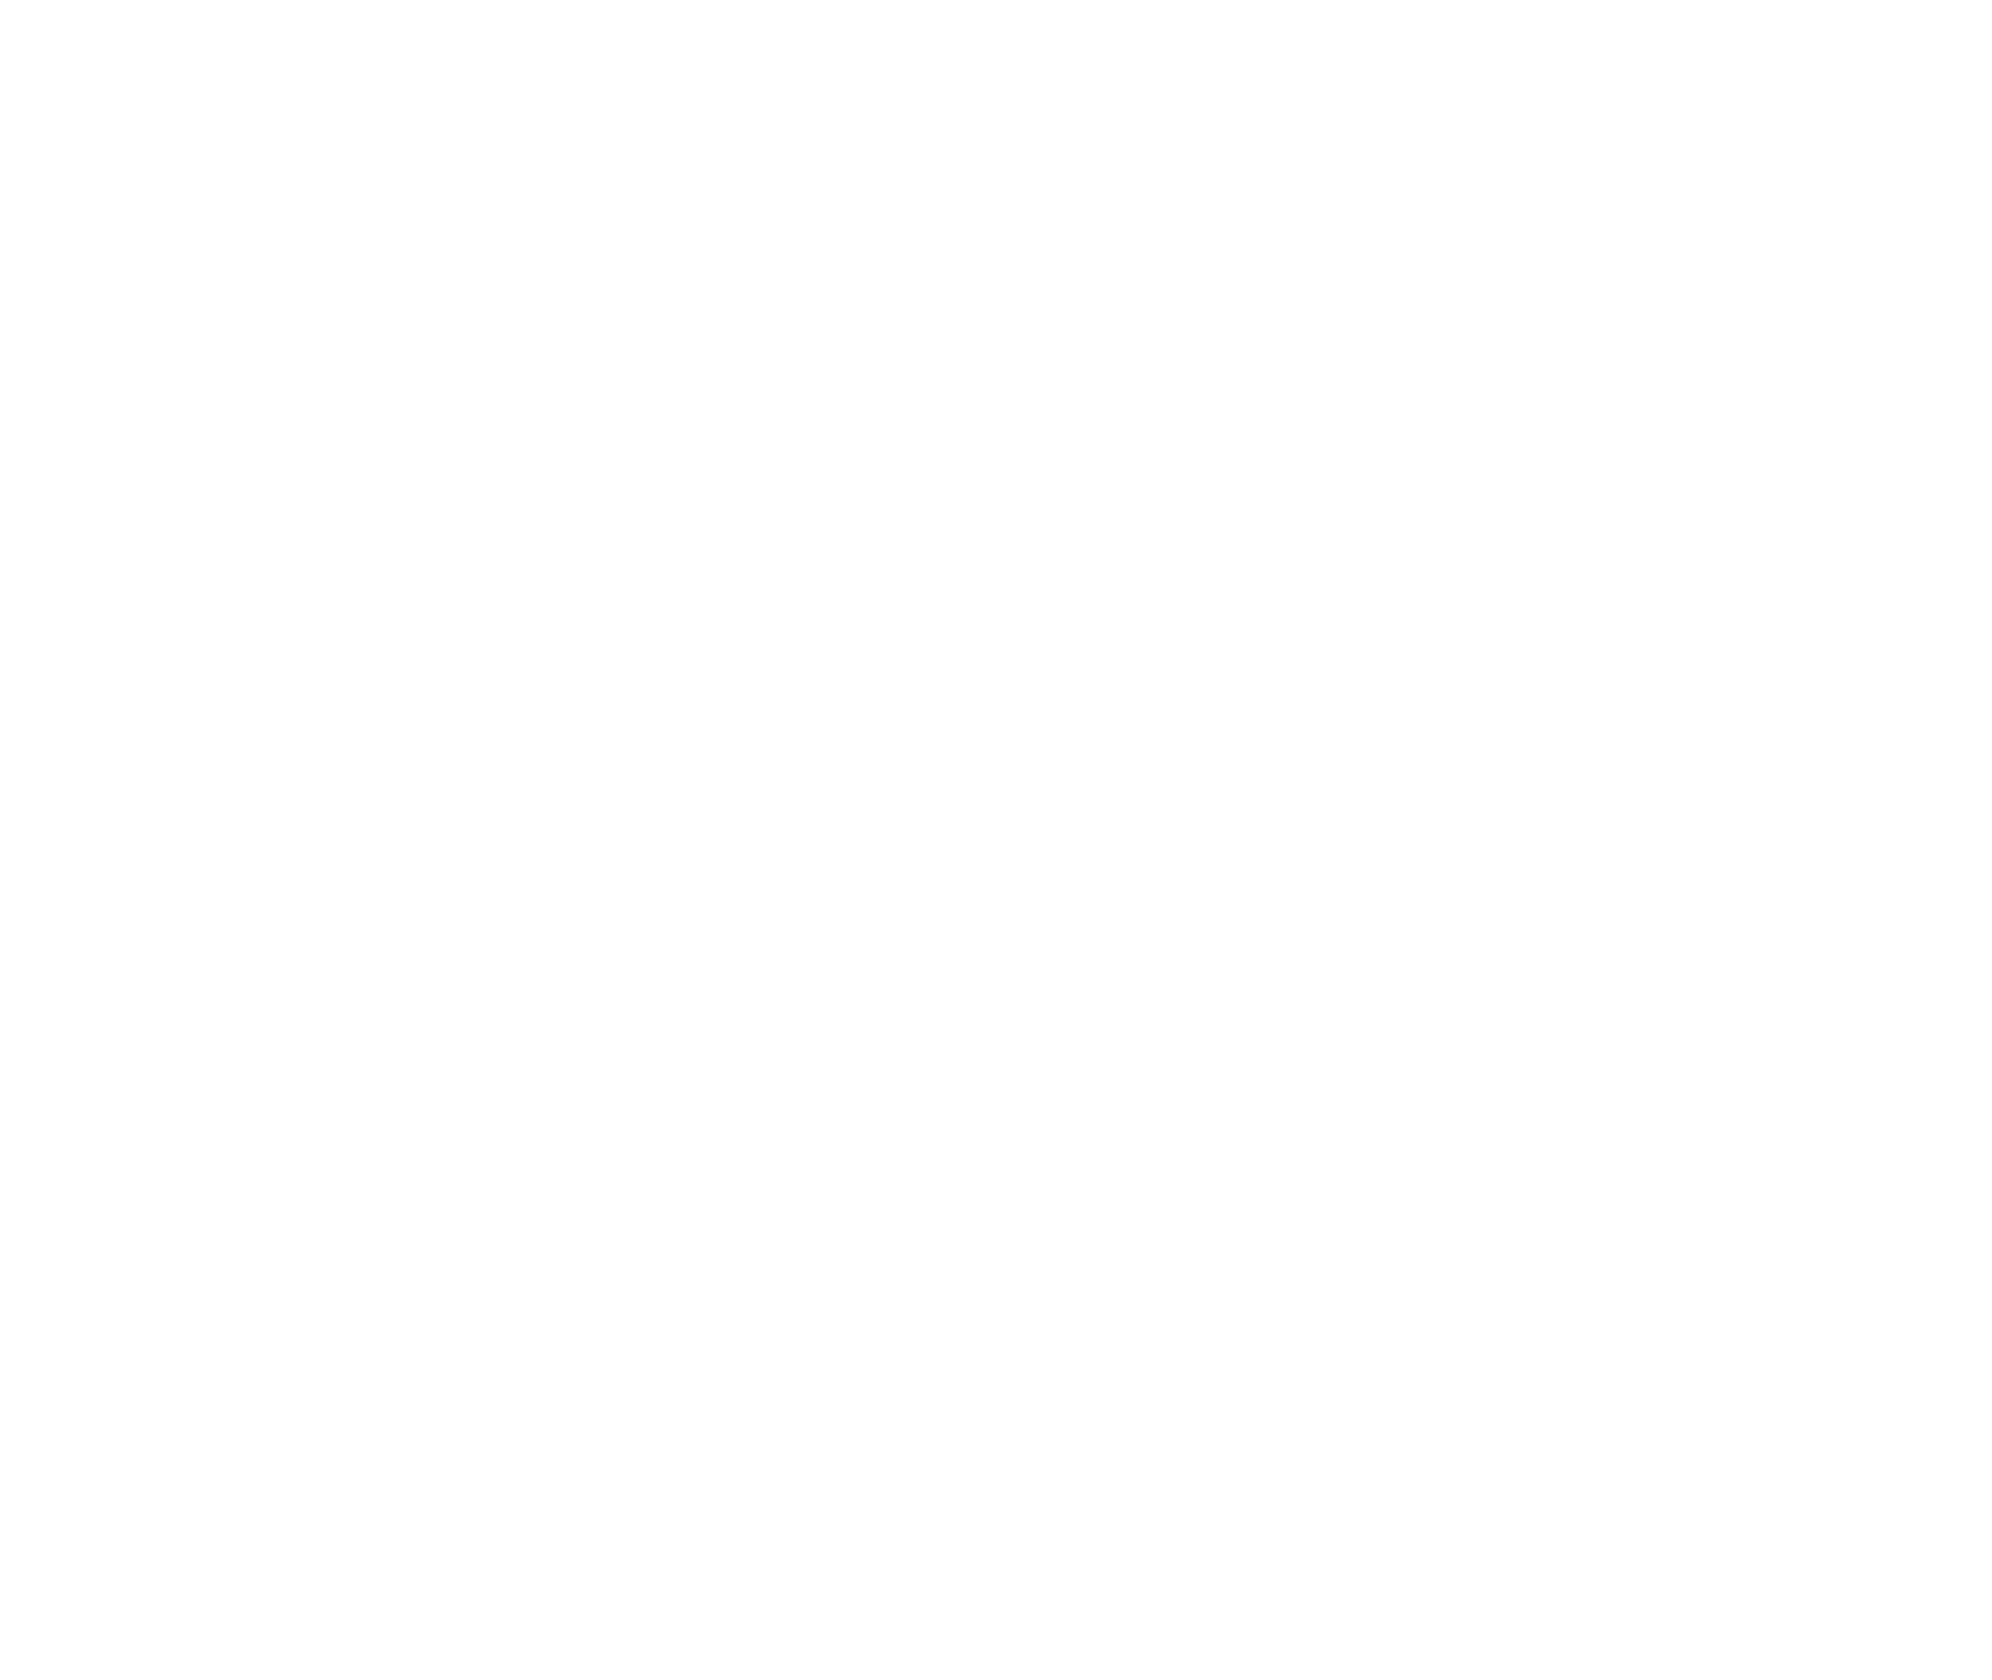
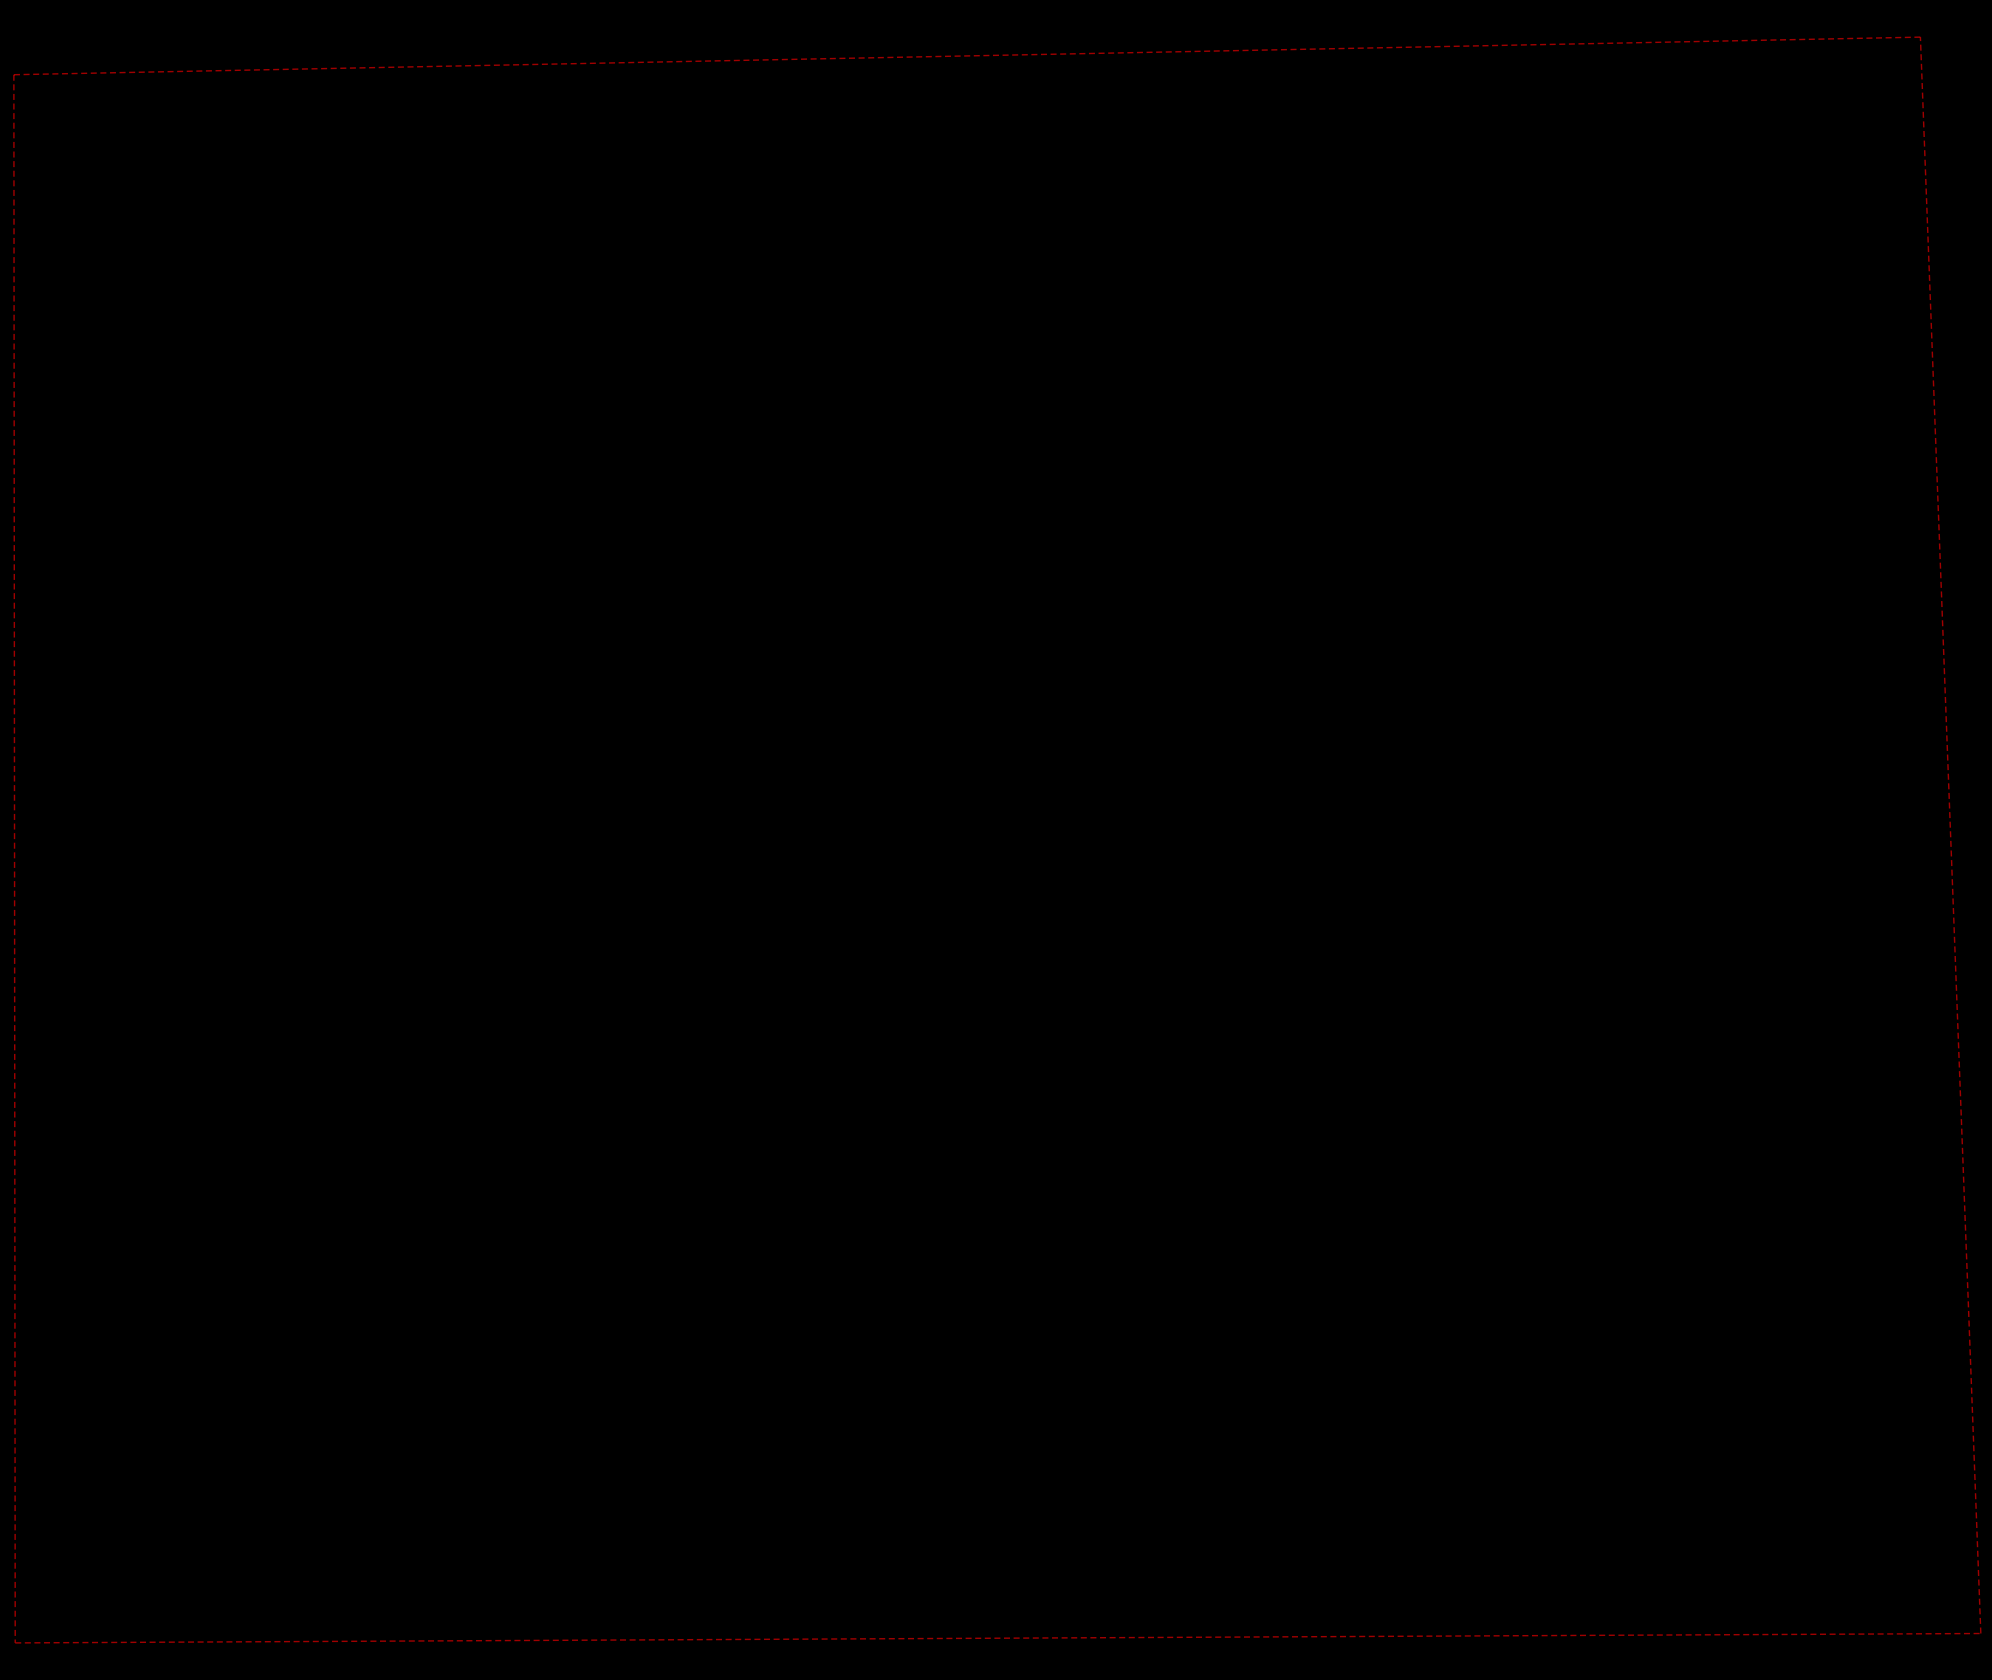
zone outline: none -> (1920, 37) (1980, 1633) (15, 1642) (13, 74) (1920, 37)

